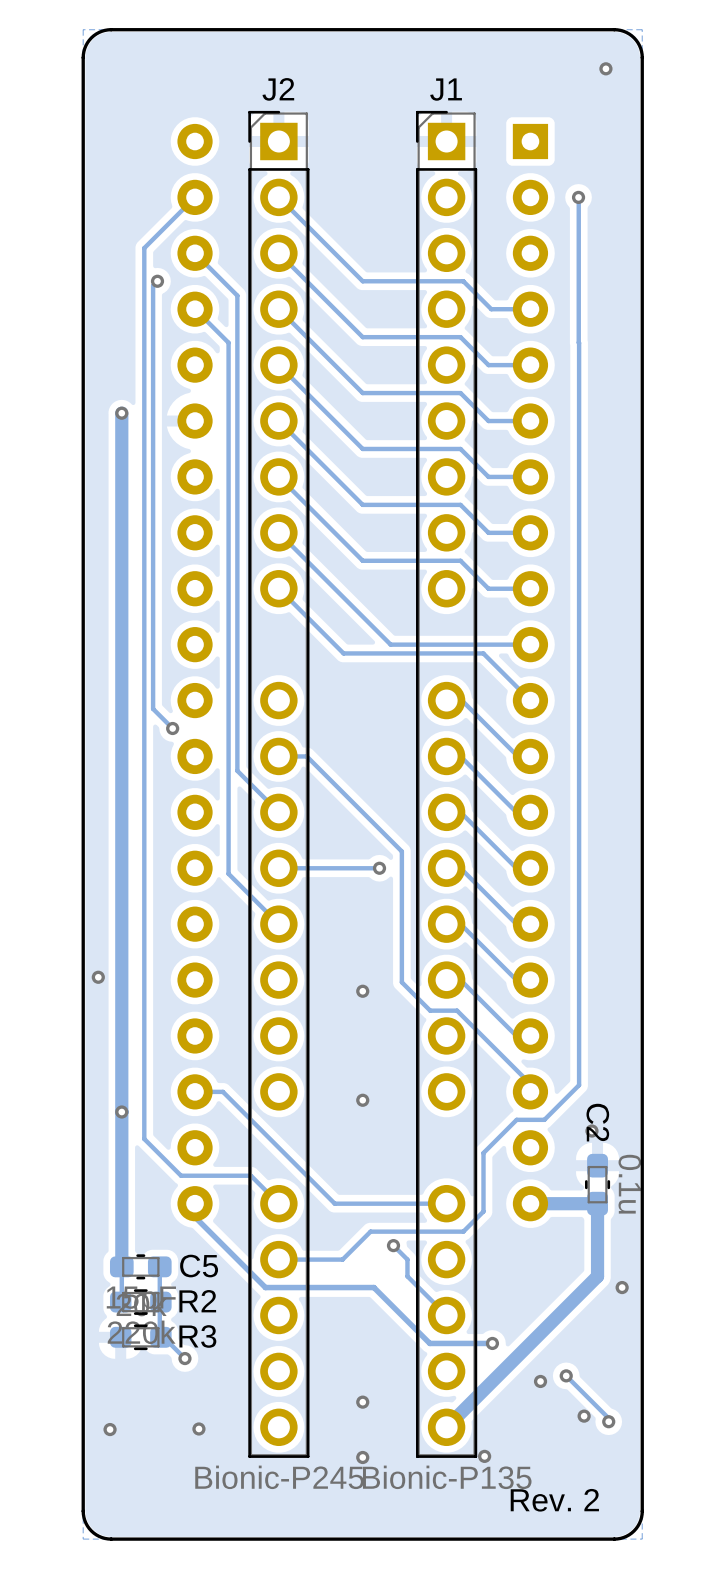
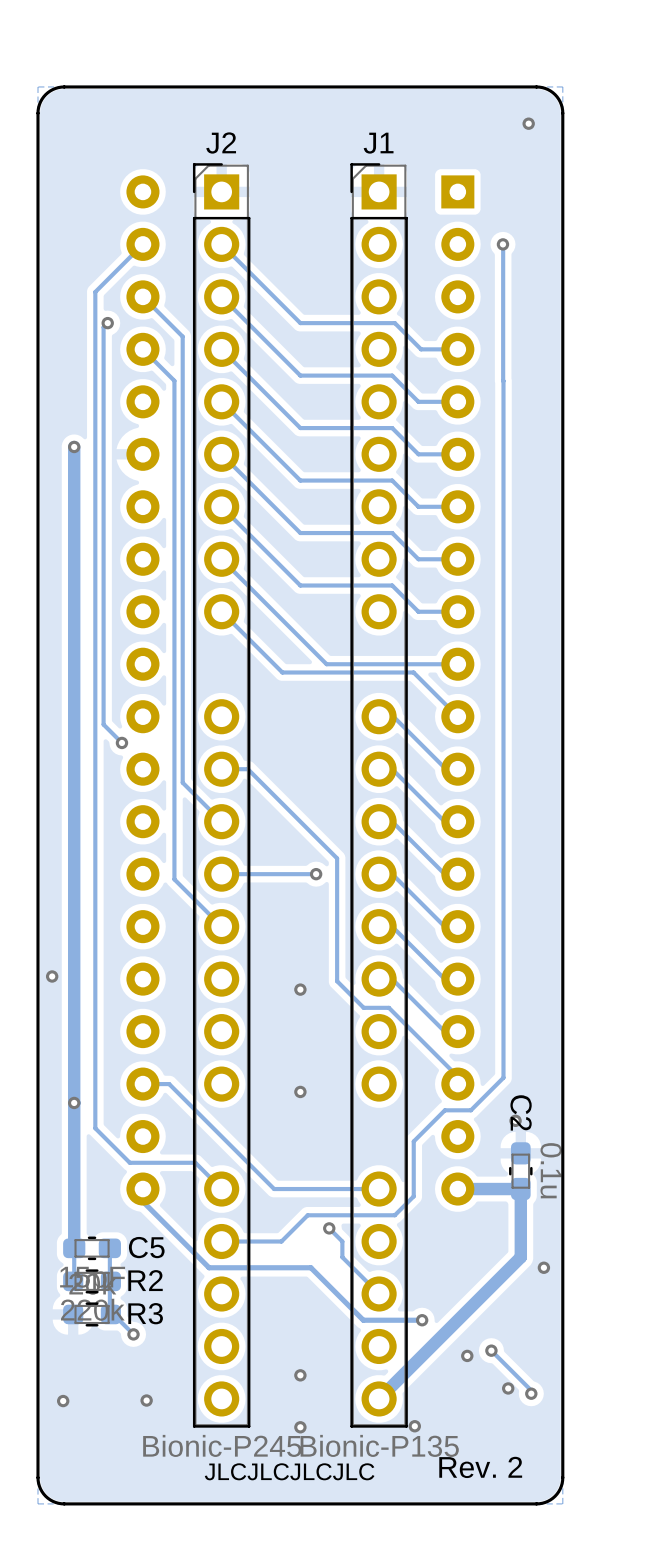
text: none -> JLCJLCJLCJLC (289, 1471)

